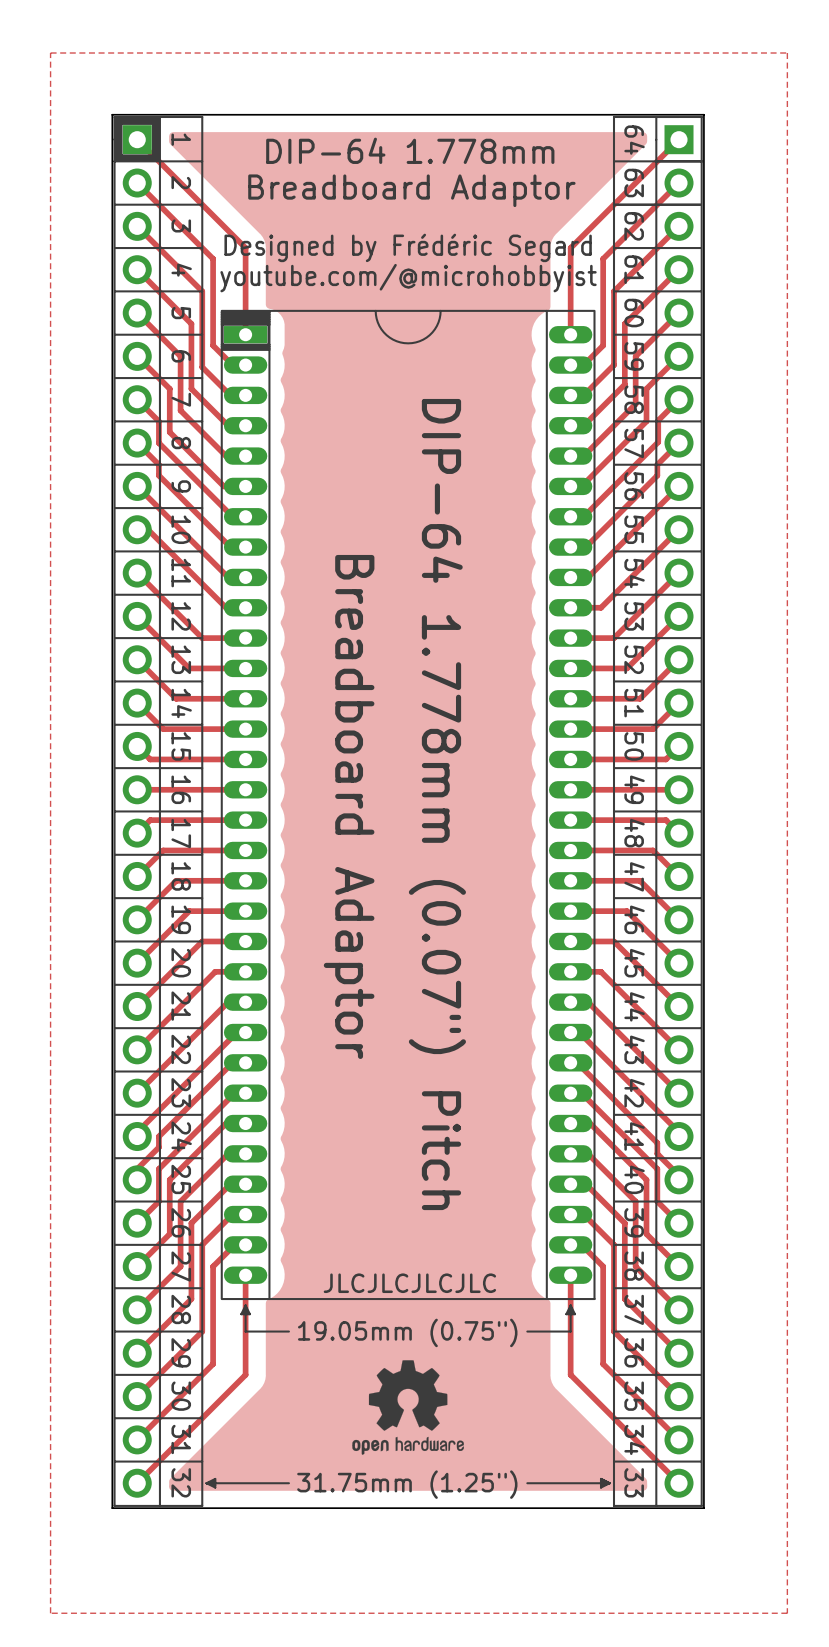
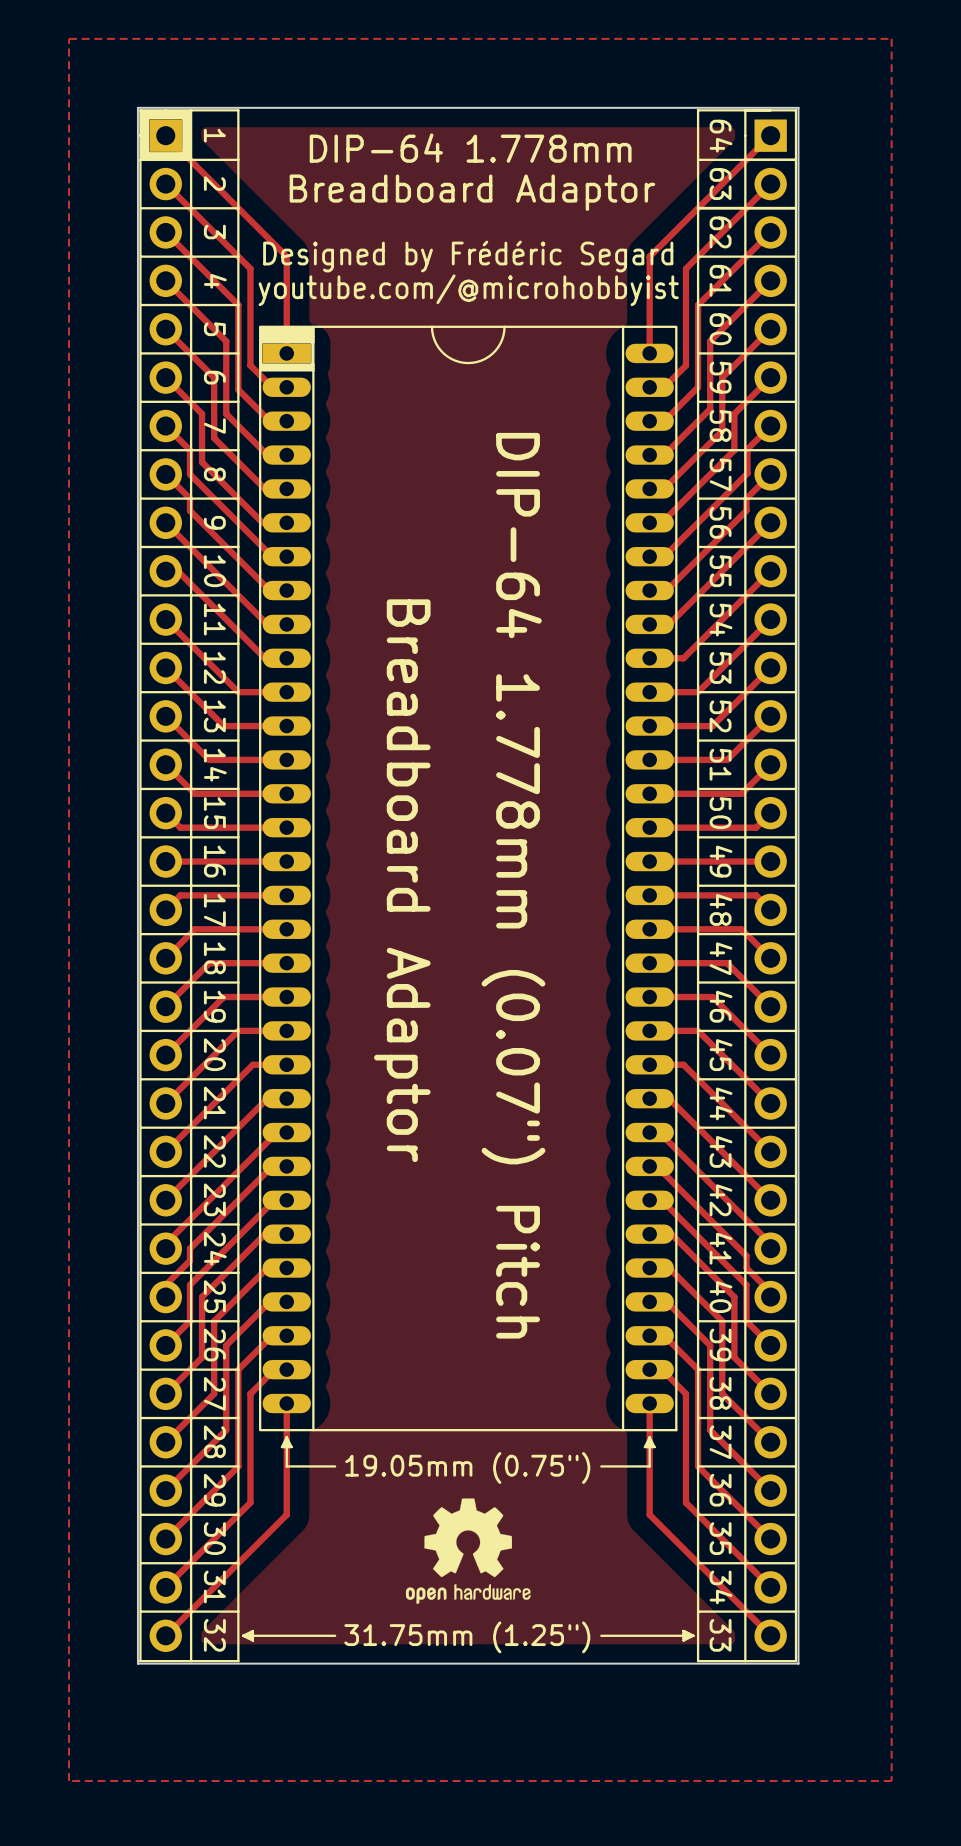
part value: DIP-64 1.778mm (0.07") Pitch (437, 804) -> none
text: none -> DIP-64 1.778mm (0.07") Pitch (513, 885)
text: JLCJLCJLCJLC (409, 1283) -> none

